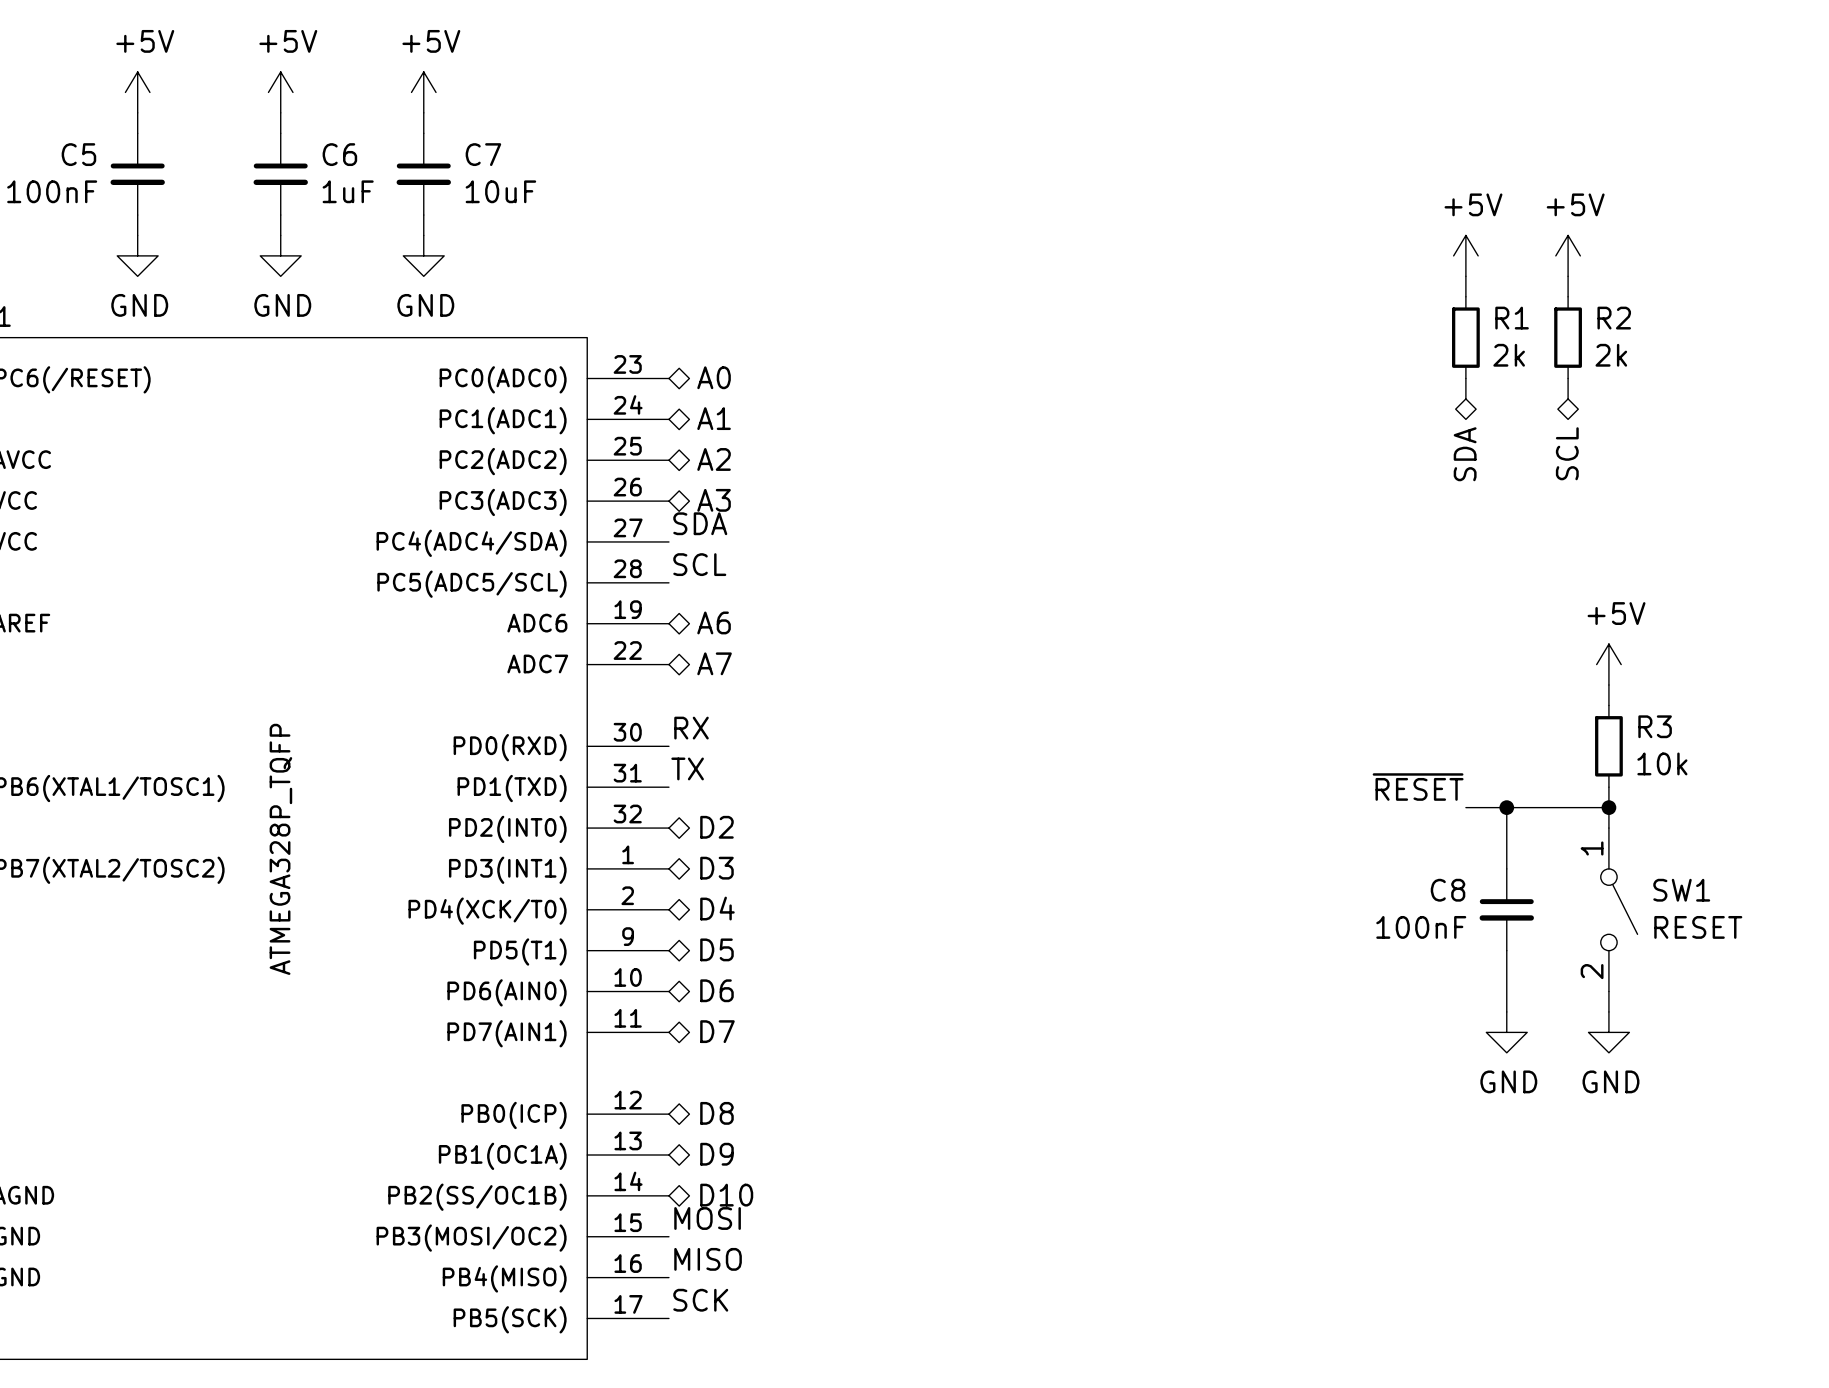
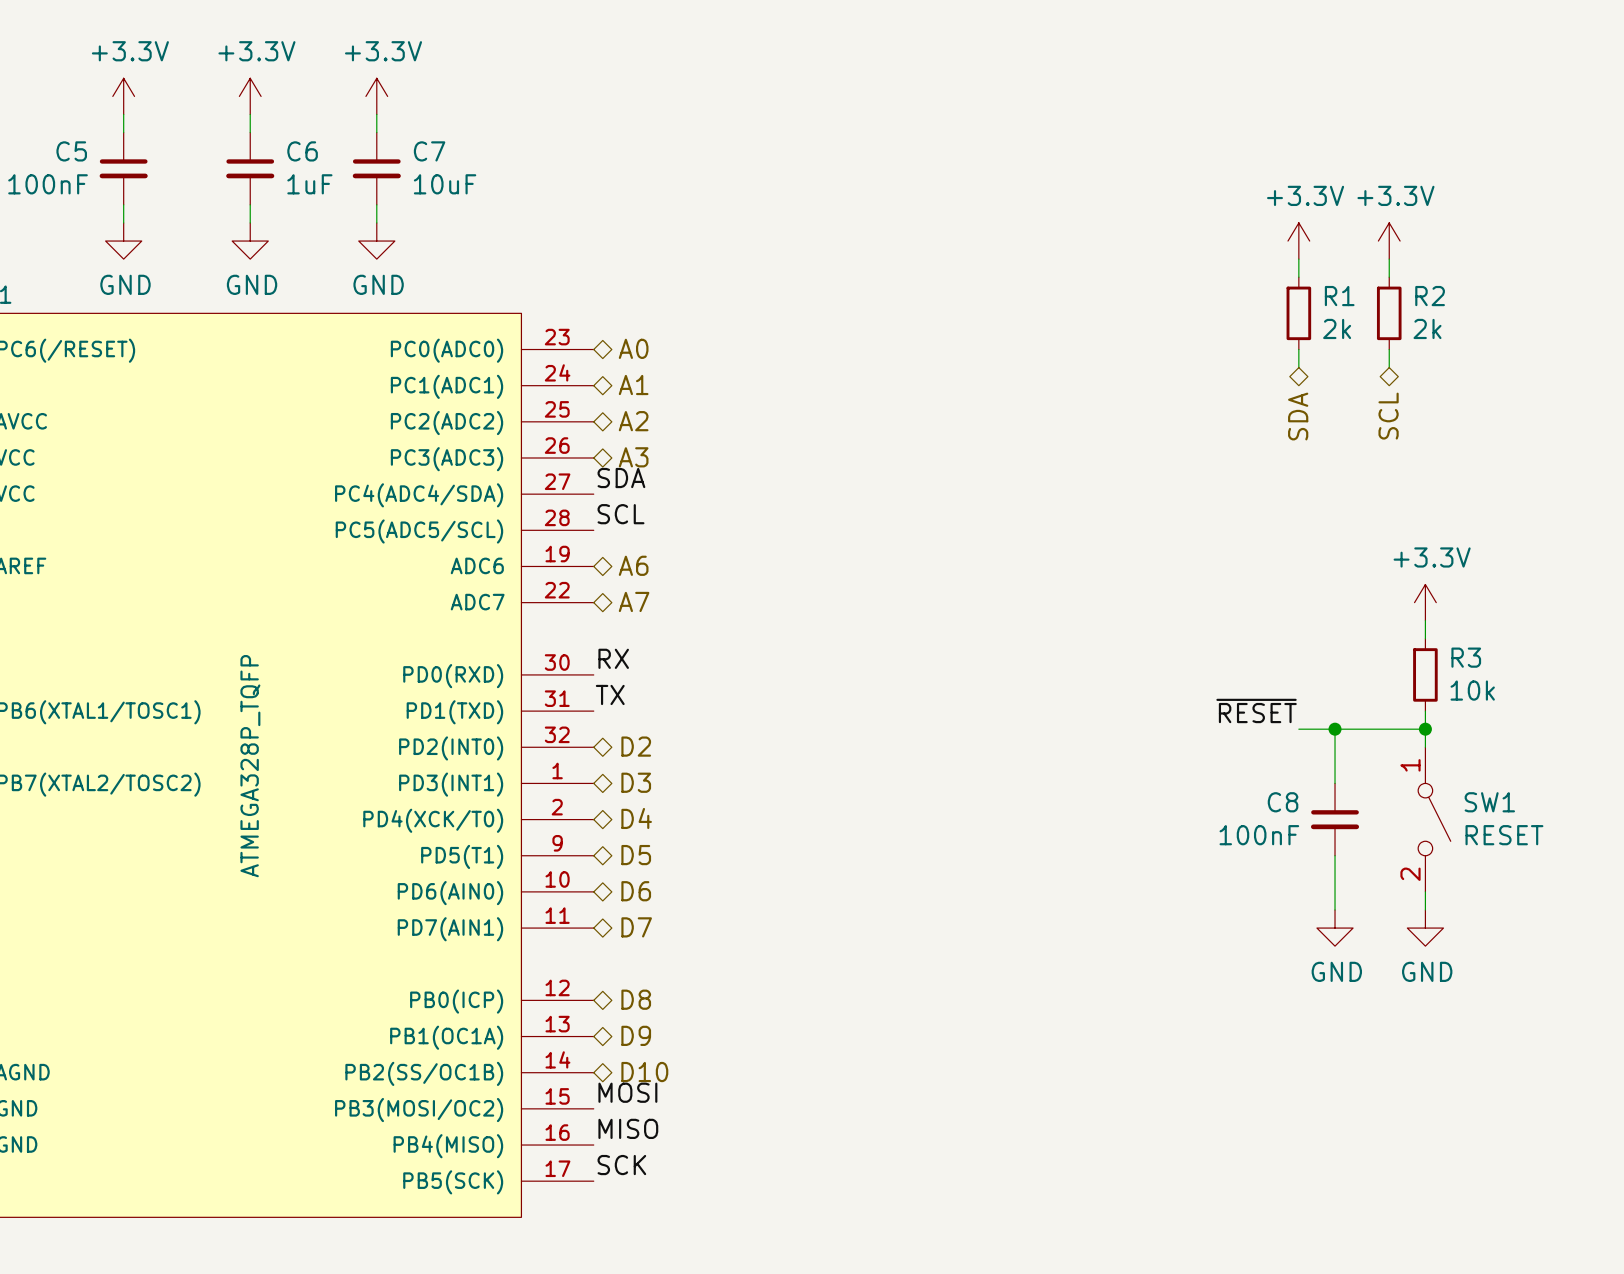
power symbol: +5V (137, 92) -> +3.3V (123, 96)
power symbol: +5V (280, 92) -> +3.3V (250, 96)
power symbol: +5V (423, 92) -> +3.3V (376, 96)
power symbol: +5V (1465, 255) -> +3.3V (1298, 241)
power symbol: +5V (1568, 255) -> +3.3V (1389, 241)
power symbol: +5V (1608, 664) -> +3.3V (1425, 602)

